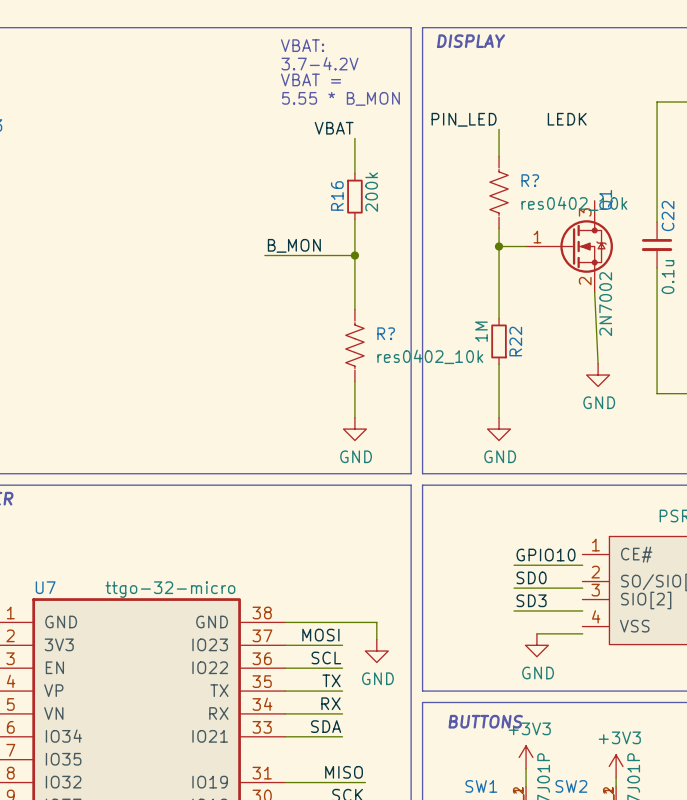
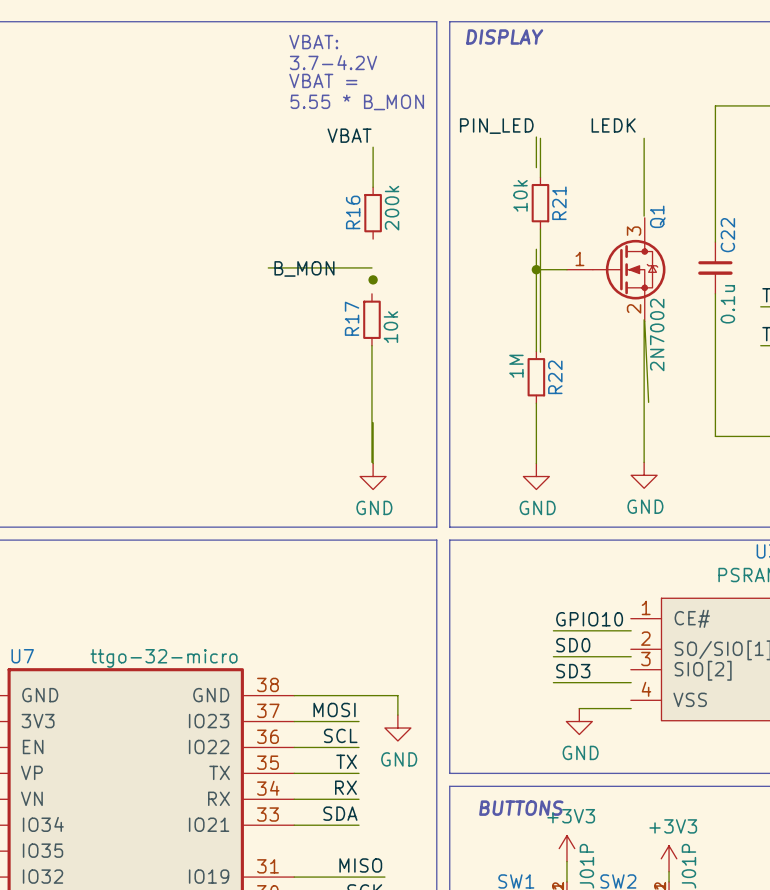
wire: none -> (540, 138) (540, 177)
wire: none -> (644, 138) (644, 216)
R21: none -> 10k (540, 203)
R?: res0402_10k (499, 192) -> none
wire: none -> (540, 229) (540, 352)
wire: (354, 219) (354, 309) -> none
wire: none -> (268, 267) (371, 267)
wire: (264, 255) (354, 255) -> none
R17: none -> 10k (371, 319)
wire: none -> (644, 319) (644, 462)
wire: none -> (371, 345) (371, 462)
R?: res0402_10k (354, 345) -> none
power symbol position: GND (598, 375) -> GND (644, 475)

